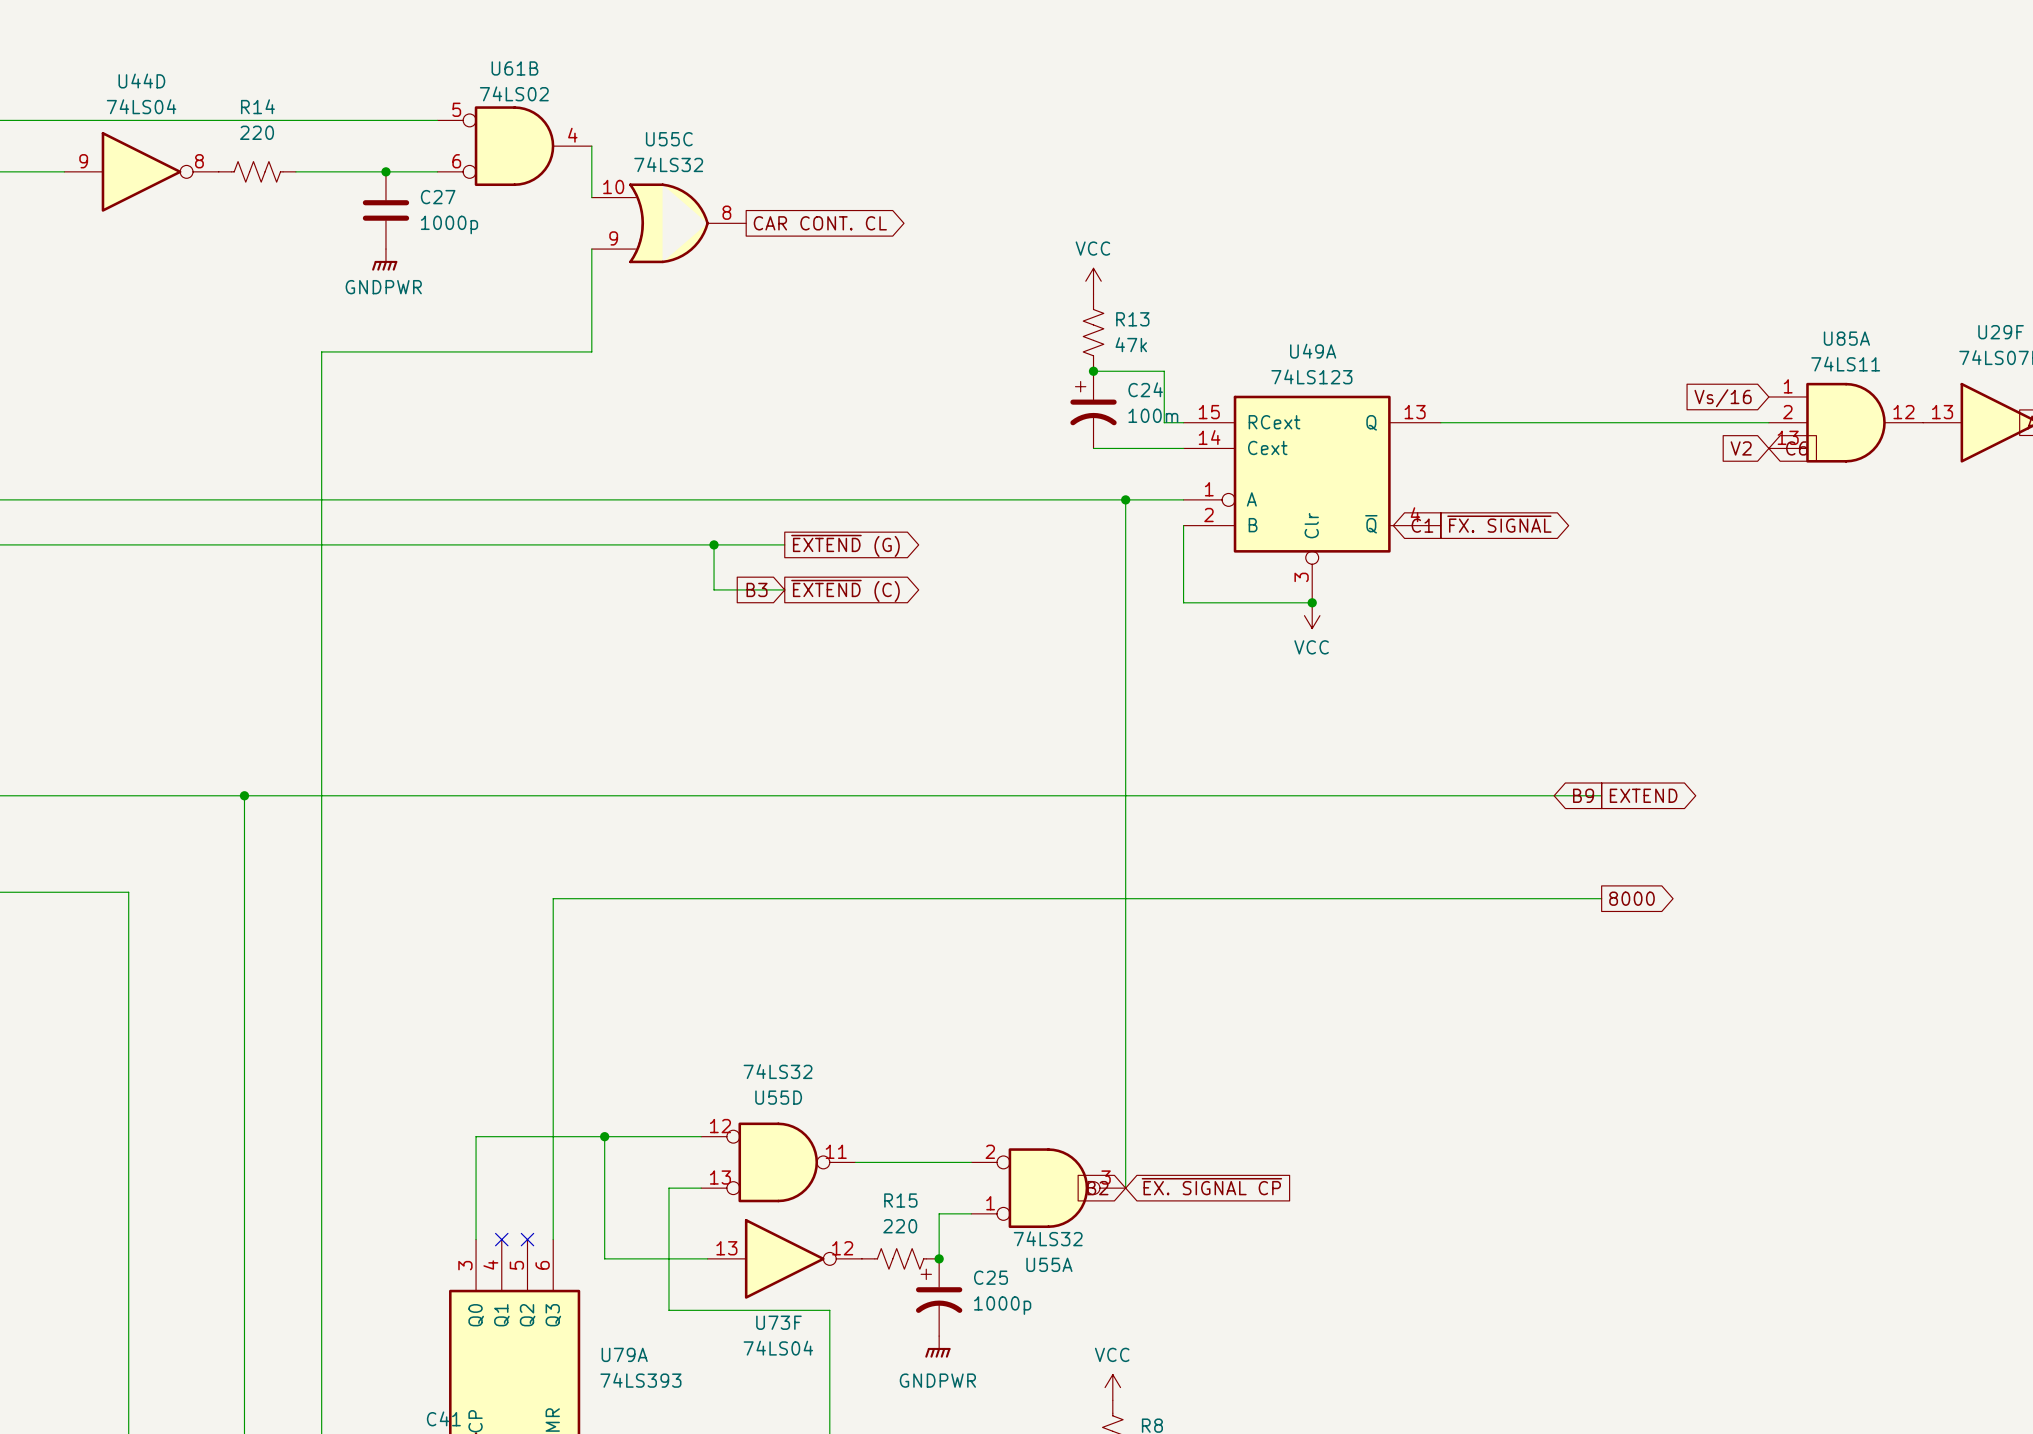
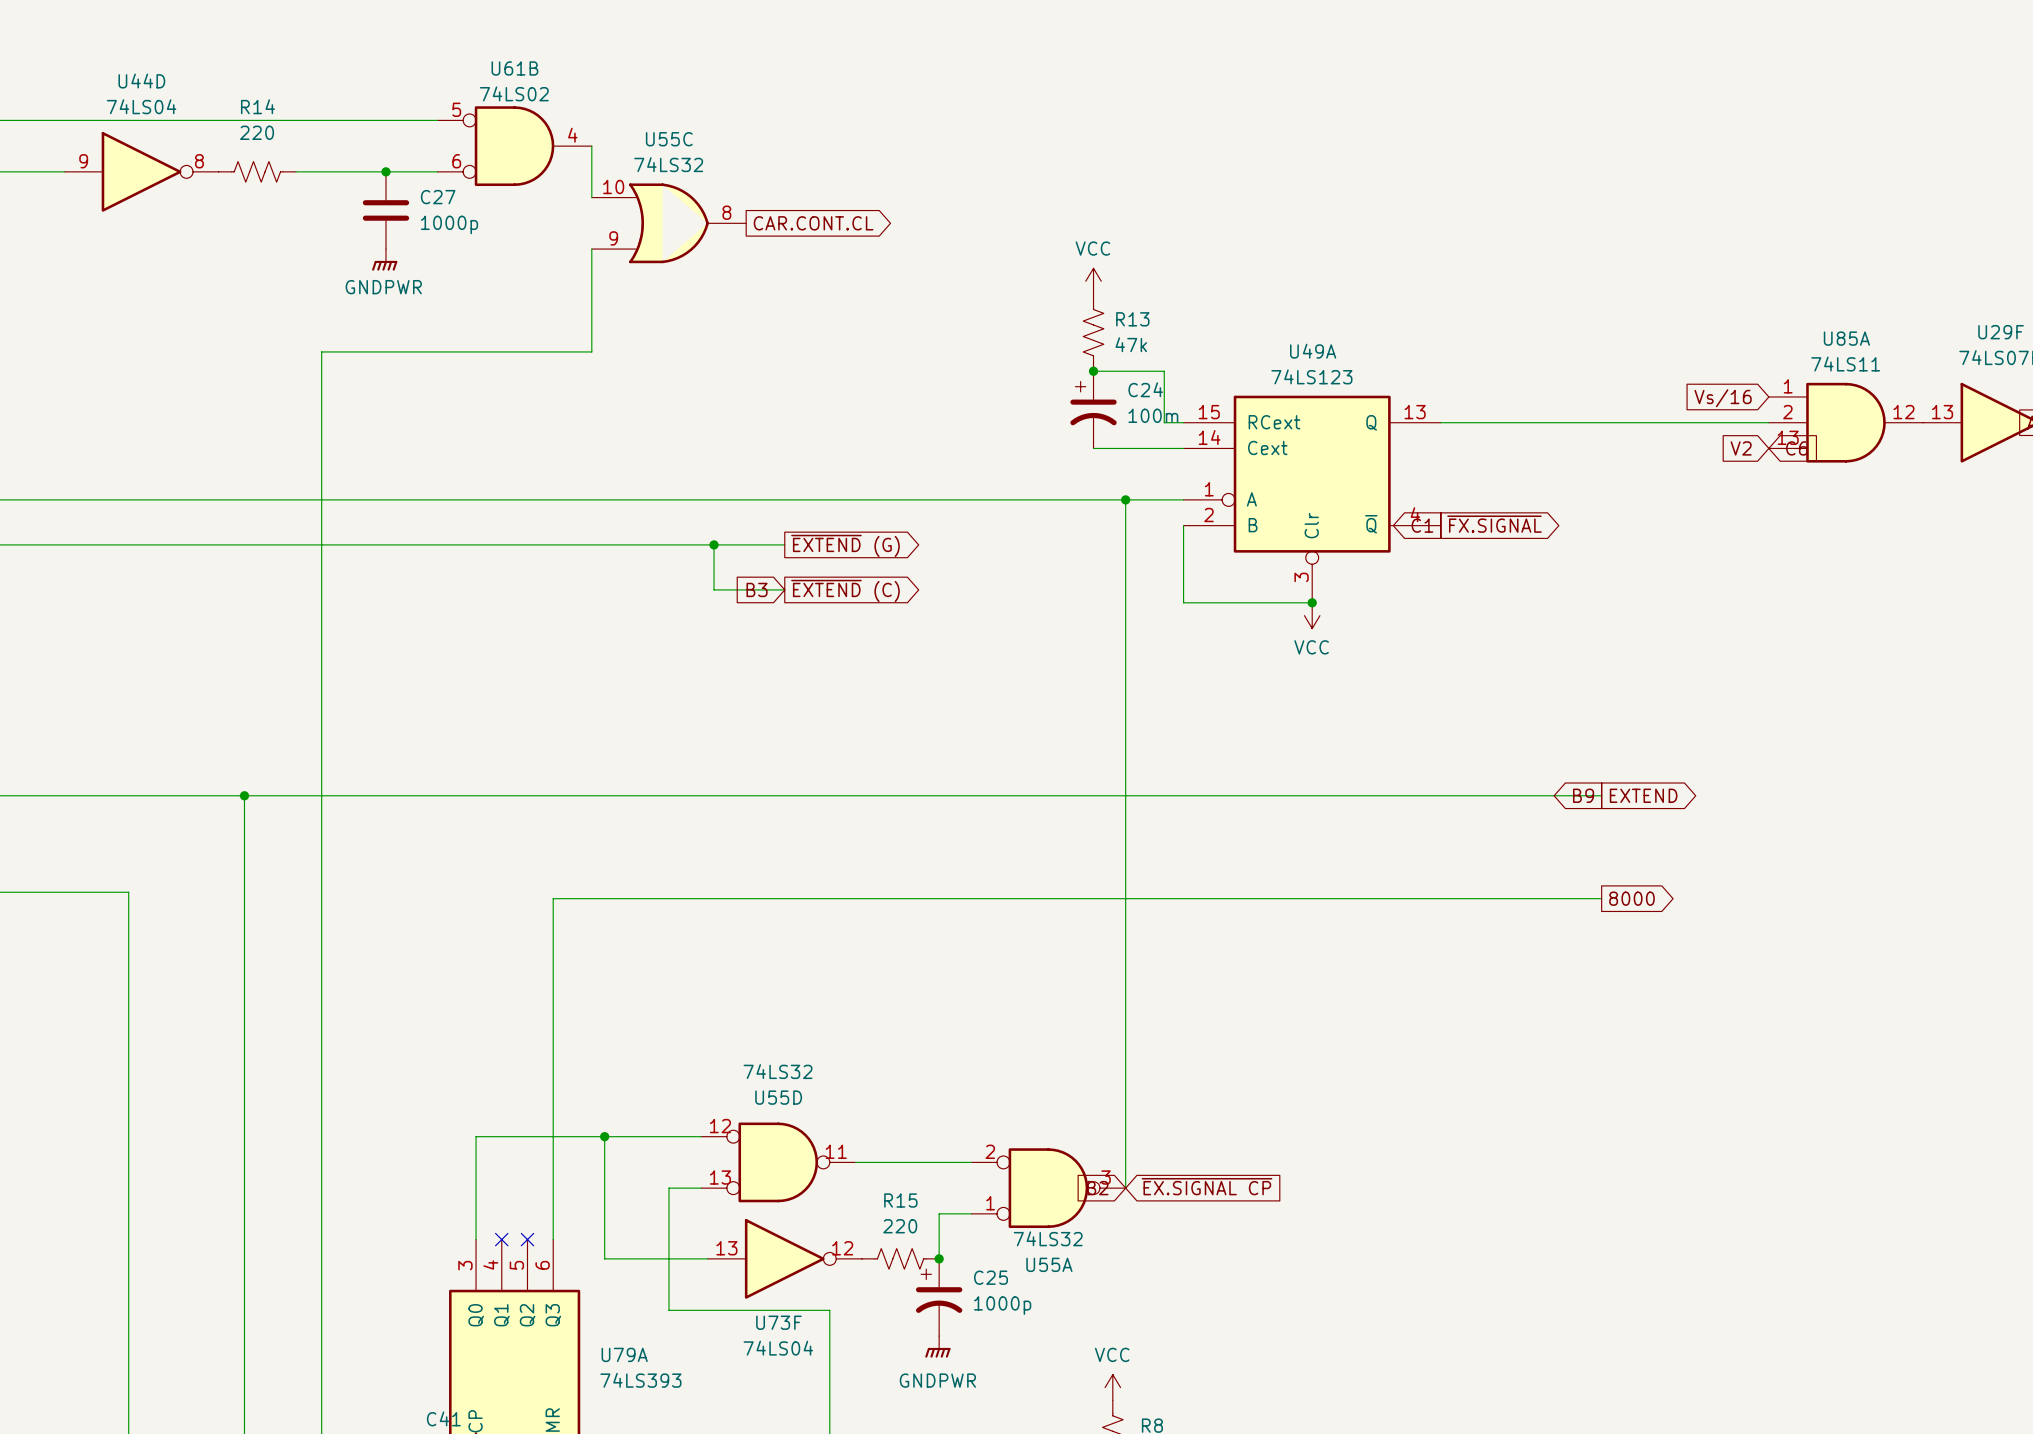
global label: CAR CONT. CL (820, 223) -> CAR.CONT.CL (813, 223)
global label: ~{FX. SIGNAL} (1499, 524) -> ~{FX.SIGNAL} (1494, 524)
global label: ~{EX. SIGNAL CP} (1211, 1186) -> ~{EX.SIGNAL CP} (1207, 1186)

